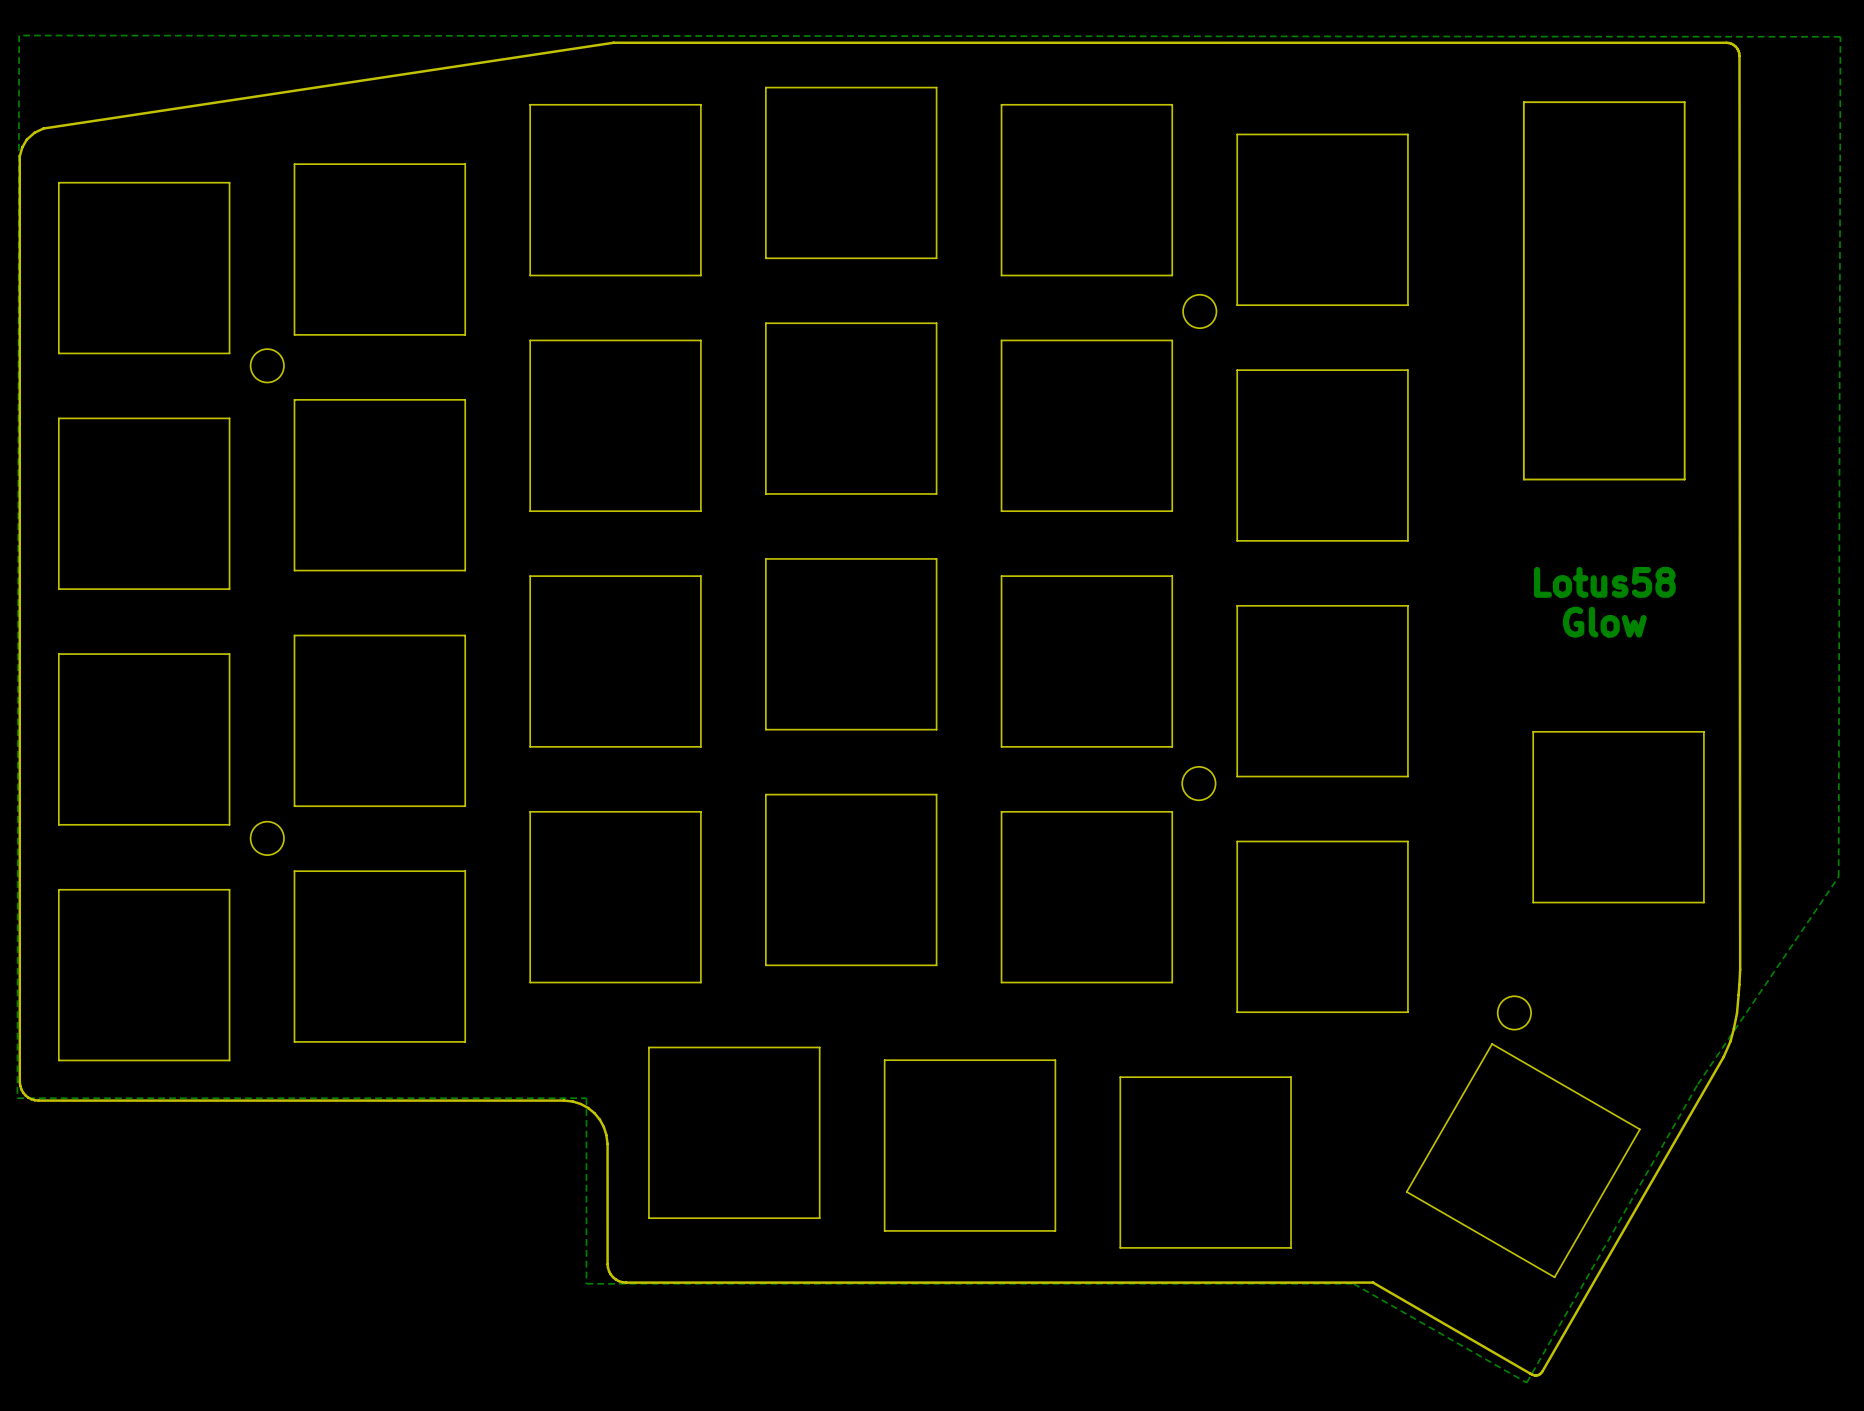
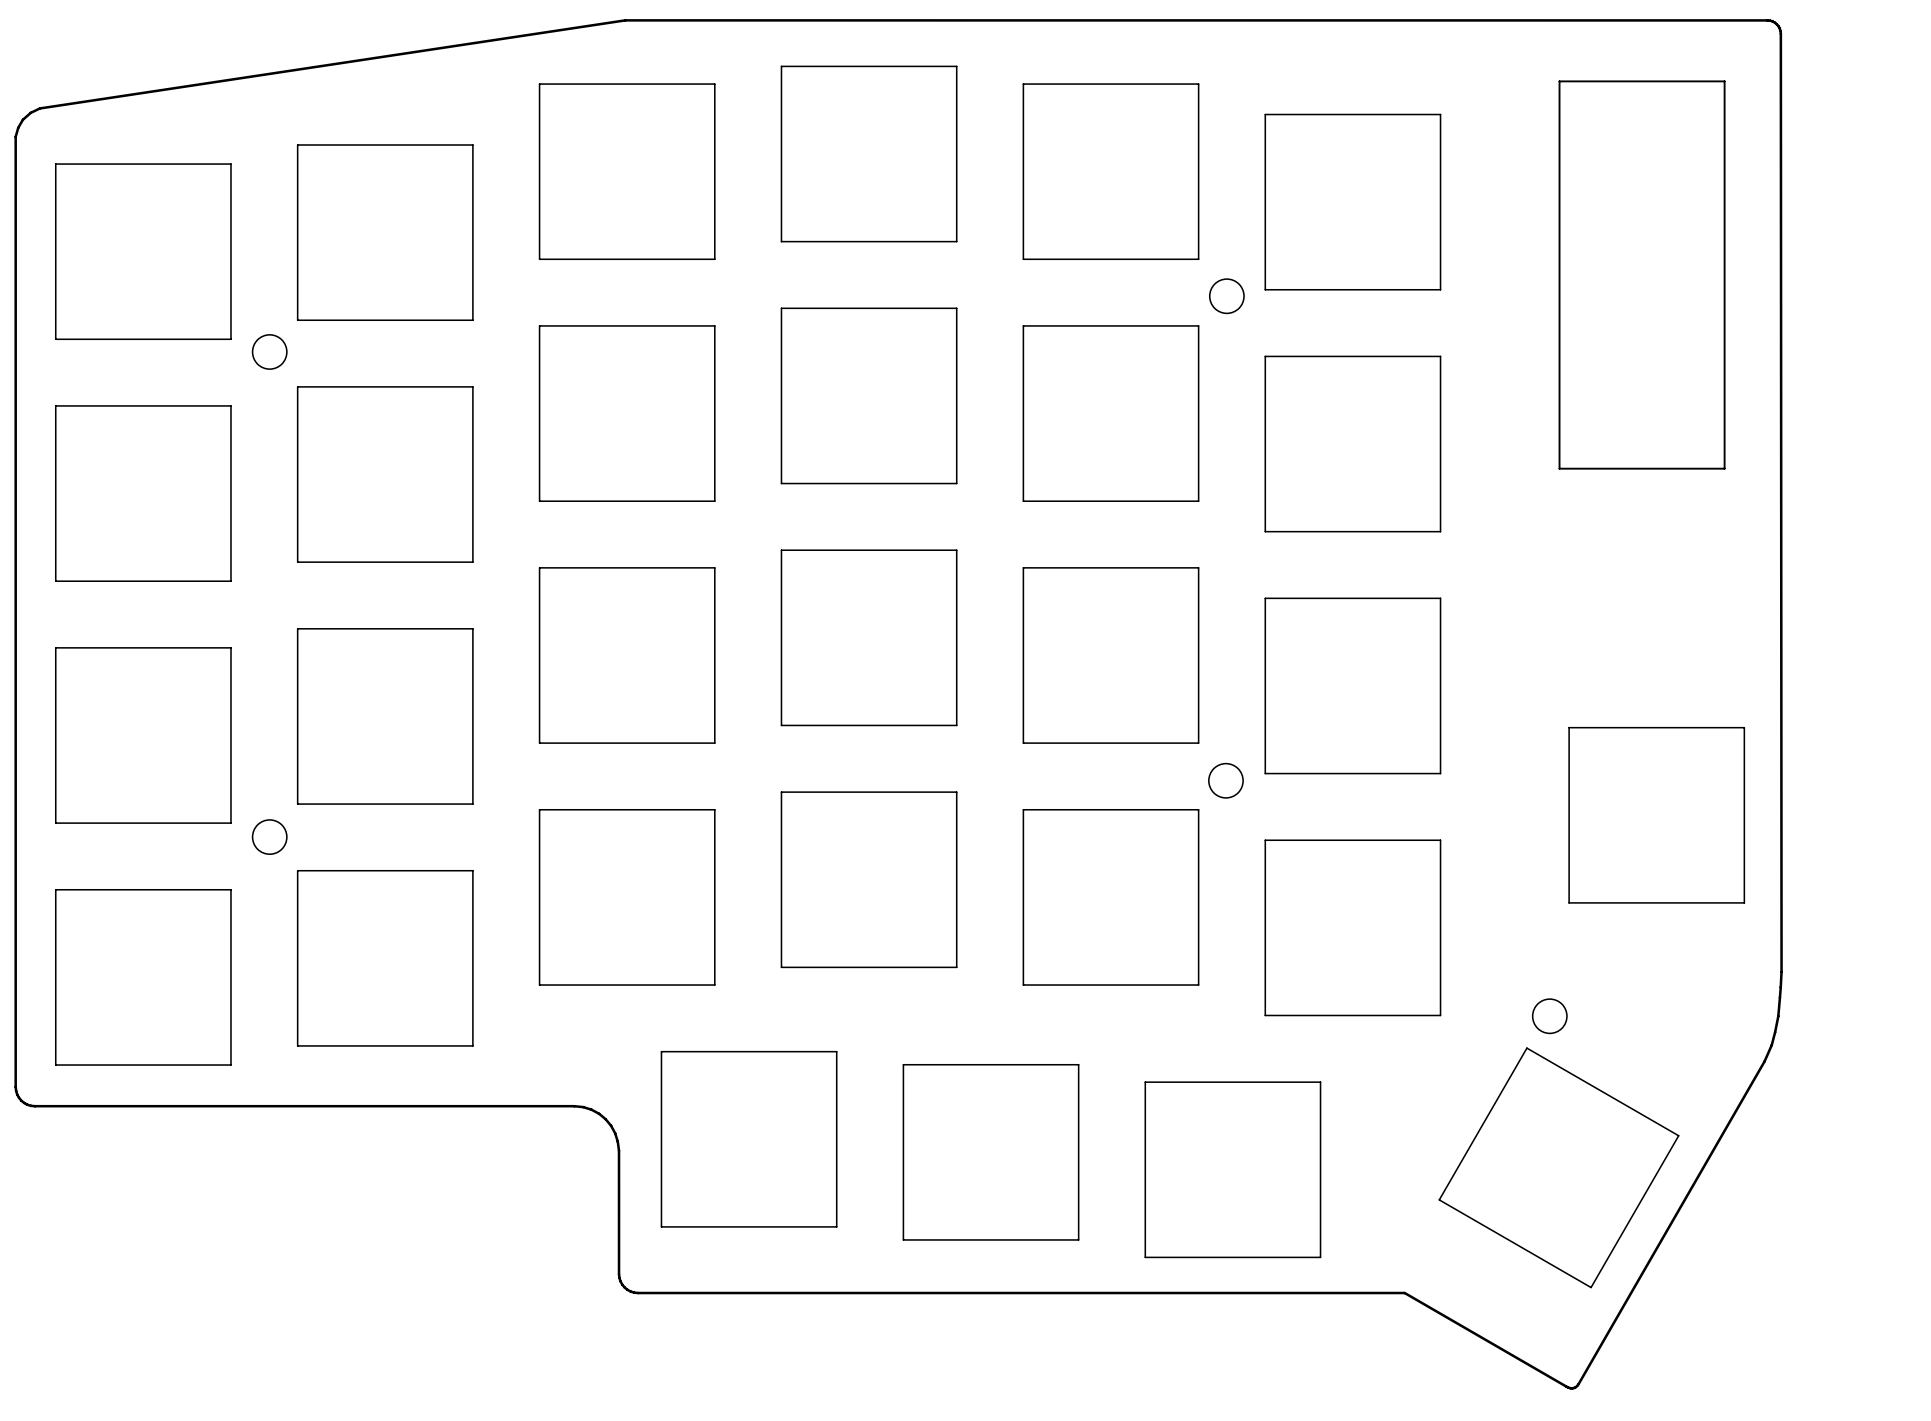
zone outline: (19, 35) (1840, 36) (1838, 876) (1697, 1084) (1526, 1382) (1353, 1283) (586, 1283) (586, 1098) (17, 1098) (19, 35) -> none
text: Lotus58 (1604, 582) -> none
text: Glow (1604, 622) -> none

